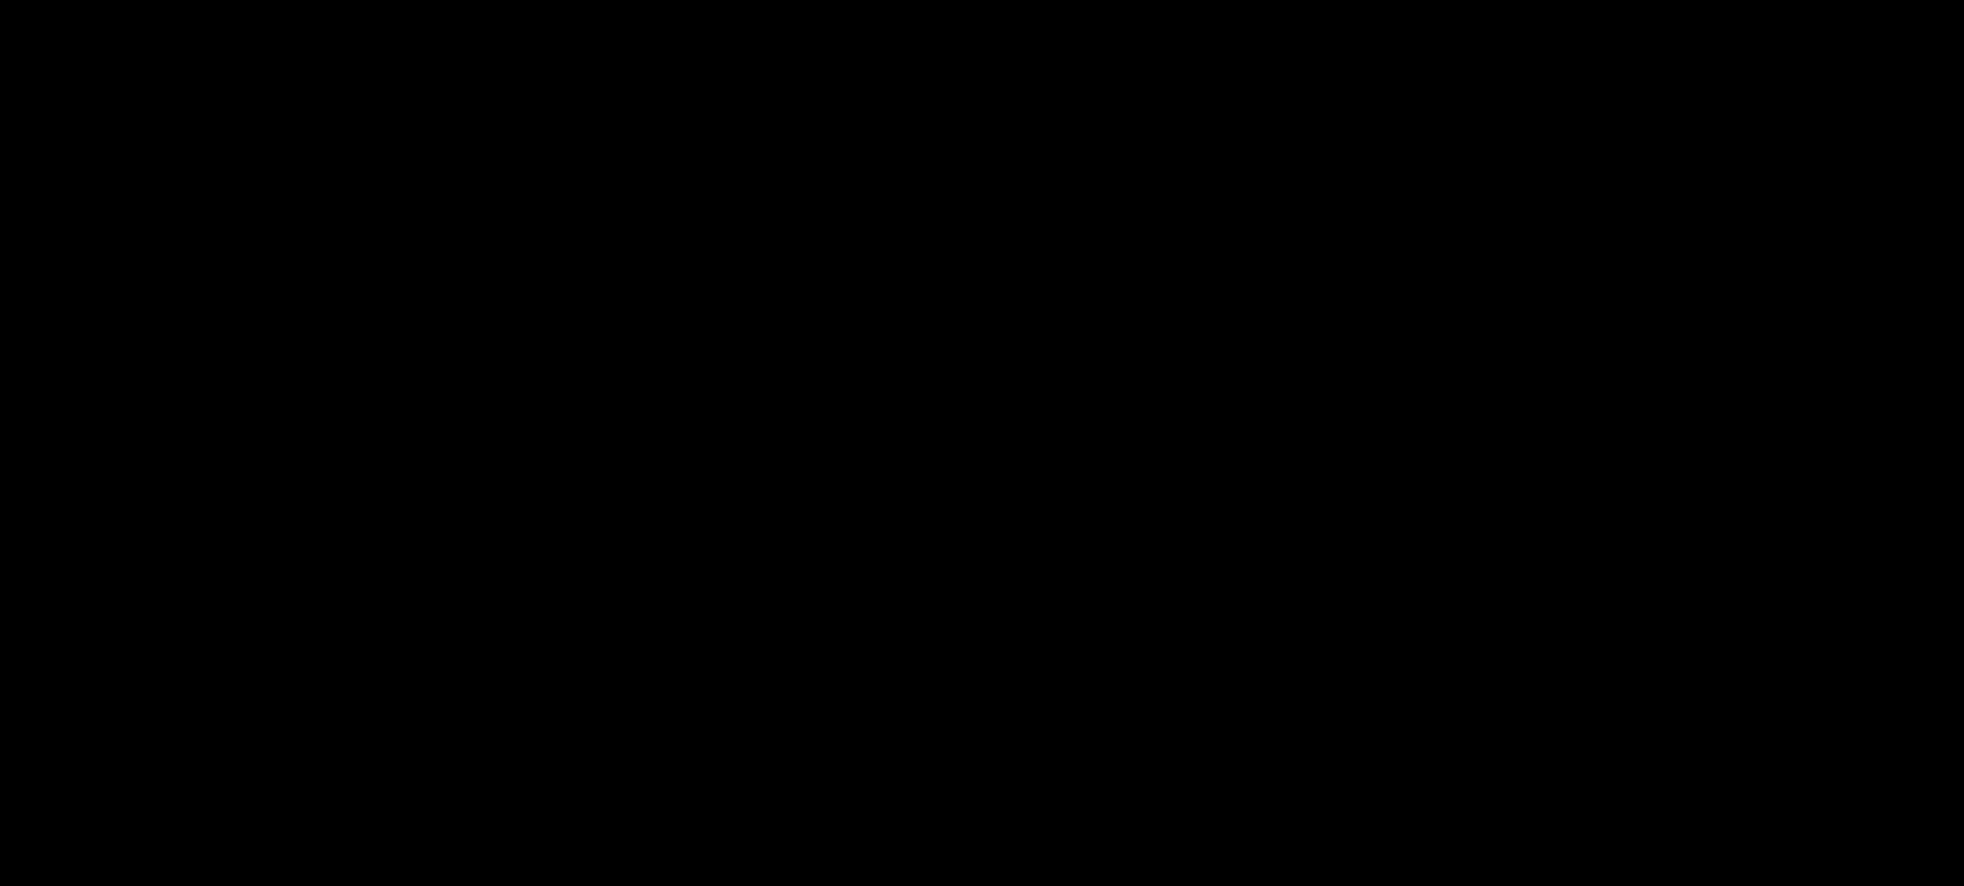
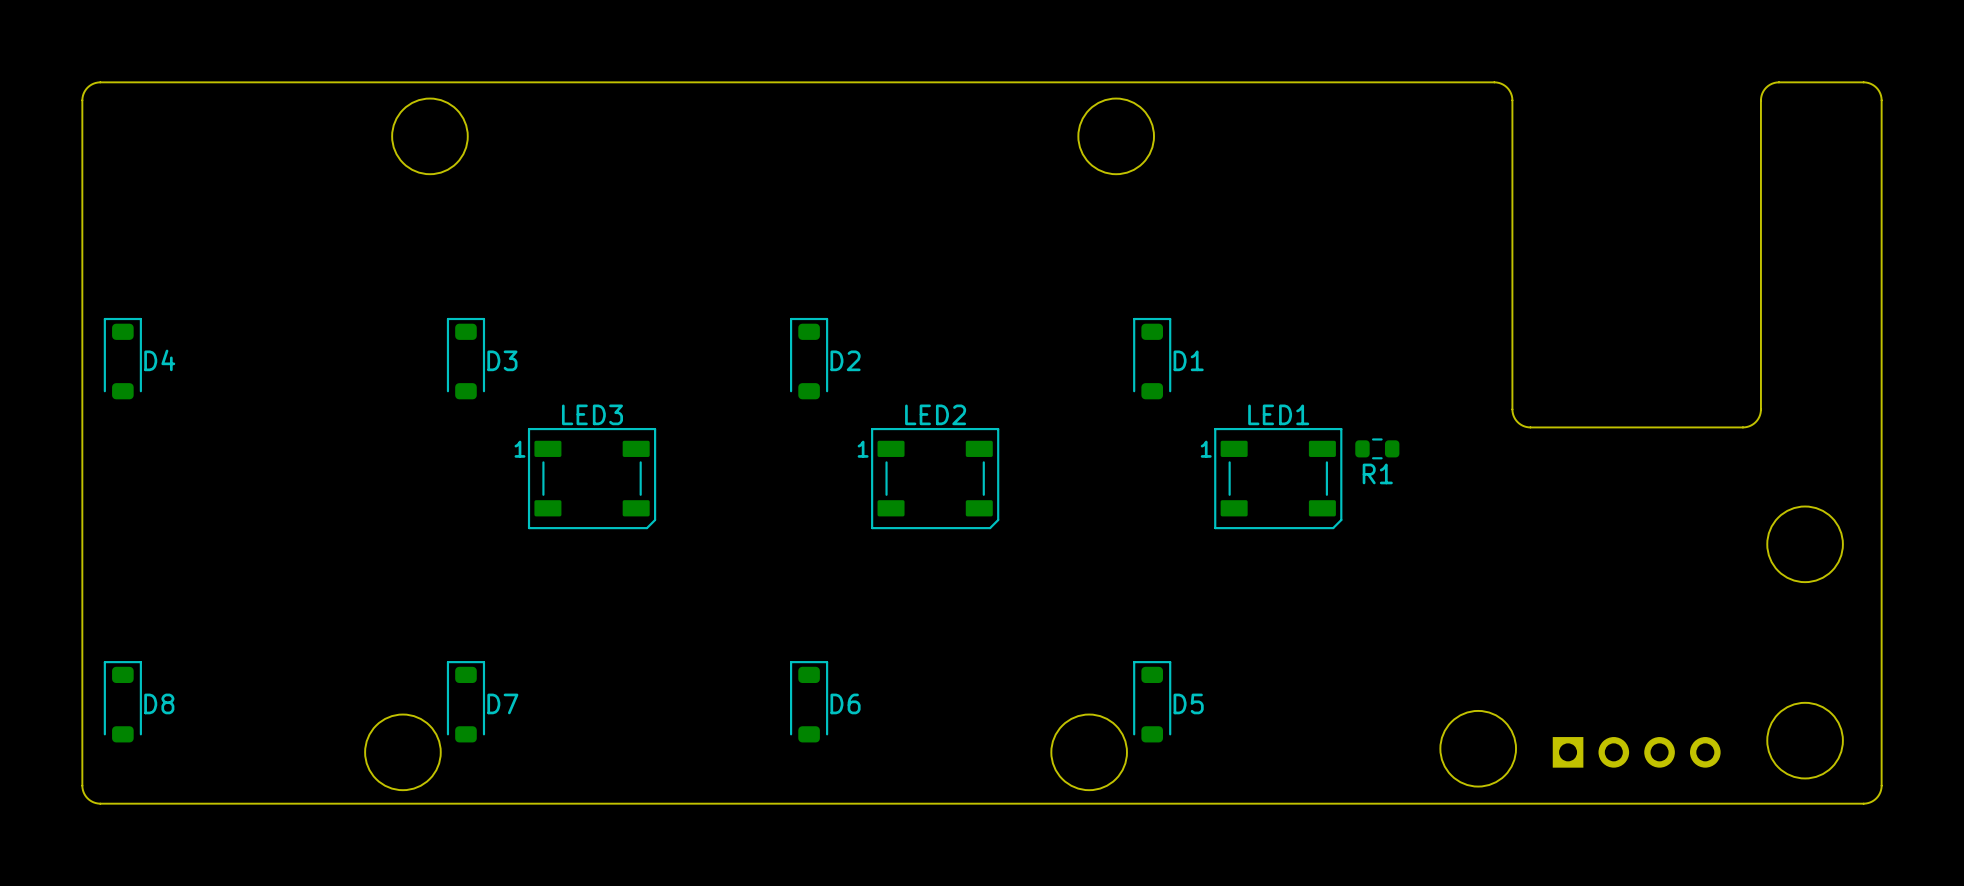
board edge: none -> (1863, 82) (1776, 82) (1768, 86) (1762, 93) (1760, 411) (1755, 422) (1742, 427) (1530, 427) (1520, 424) (1515, 419) (1512, 409) (1512, 100) (1508, 89) (1499, 82) (93, 83) (84, 91) (82, 100) (83, 792) (89, 799) (100, 803) (1870, 802) (1877, 796) (1881, 785) (1881, 100) (1876, 87) (1863, 82)
round board edge: none -> [391, 98, 469, 175]
round board edge: none -> [1077, 98, 1155, 175]
D4: none -> (122, 358)
D3: none -> (465, 358)
D2: none -> (809, 358)
D1: none -> (1152, 358)
R1: none -> (1377, 448)
LED3: none -> (592, 478)
LED2: none -> (935, 478)
LED1: none -> (1278, 478)
round board edge: none -> [1766, 506, 1844, 583]
D8: none -> (122, 701)
D7: none -> (465, 701)
D6: none -> (809, 701)
D5: none -> (1152, 701)
round board edge: none -> [1766, 702, 1844, 779]
round board edge: none -> [1439, 710, 1517, 788]
round board edge: none -> [364, 714, 442, 791]
round board edge: none -> [1050, 714, 1128, 791]
part: none -> (1636, 752)

